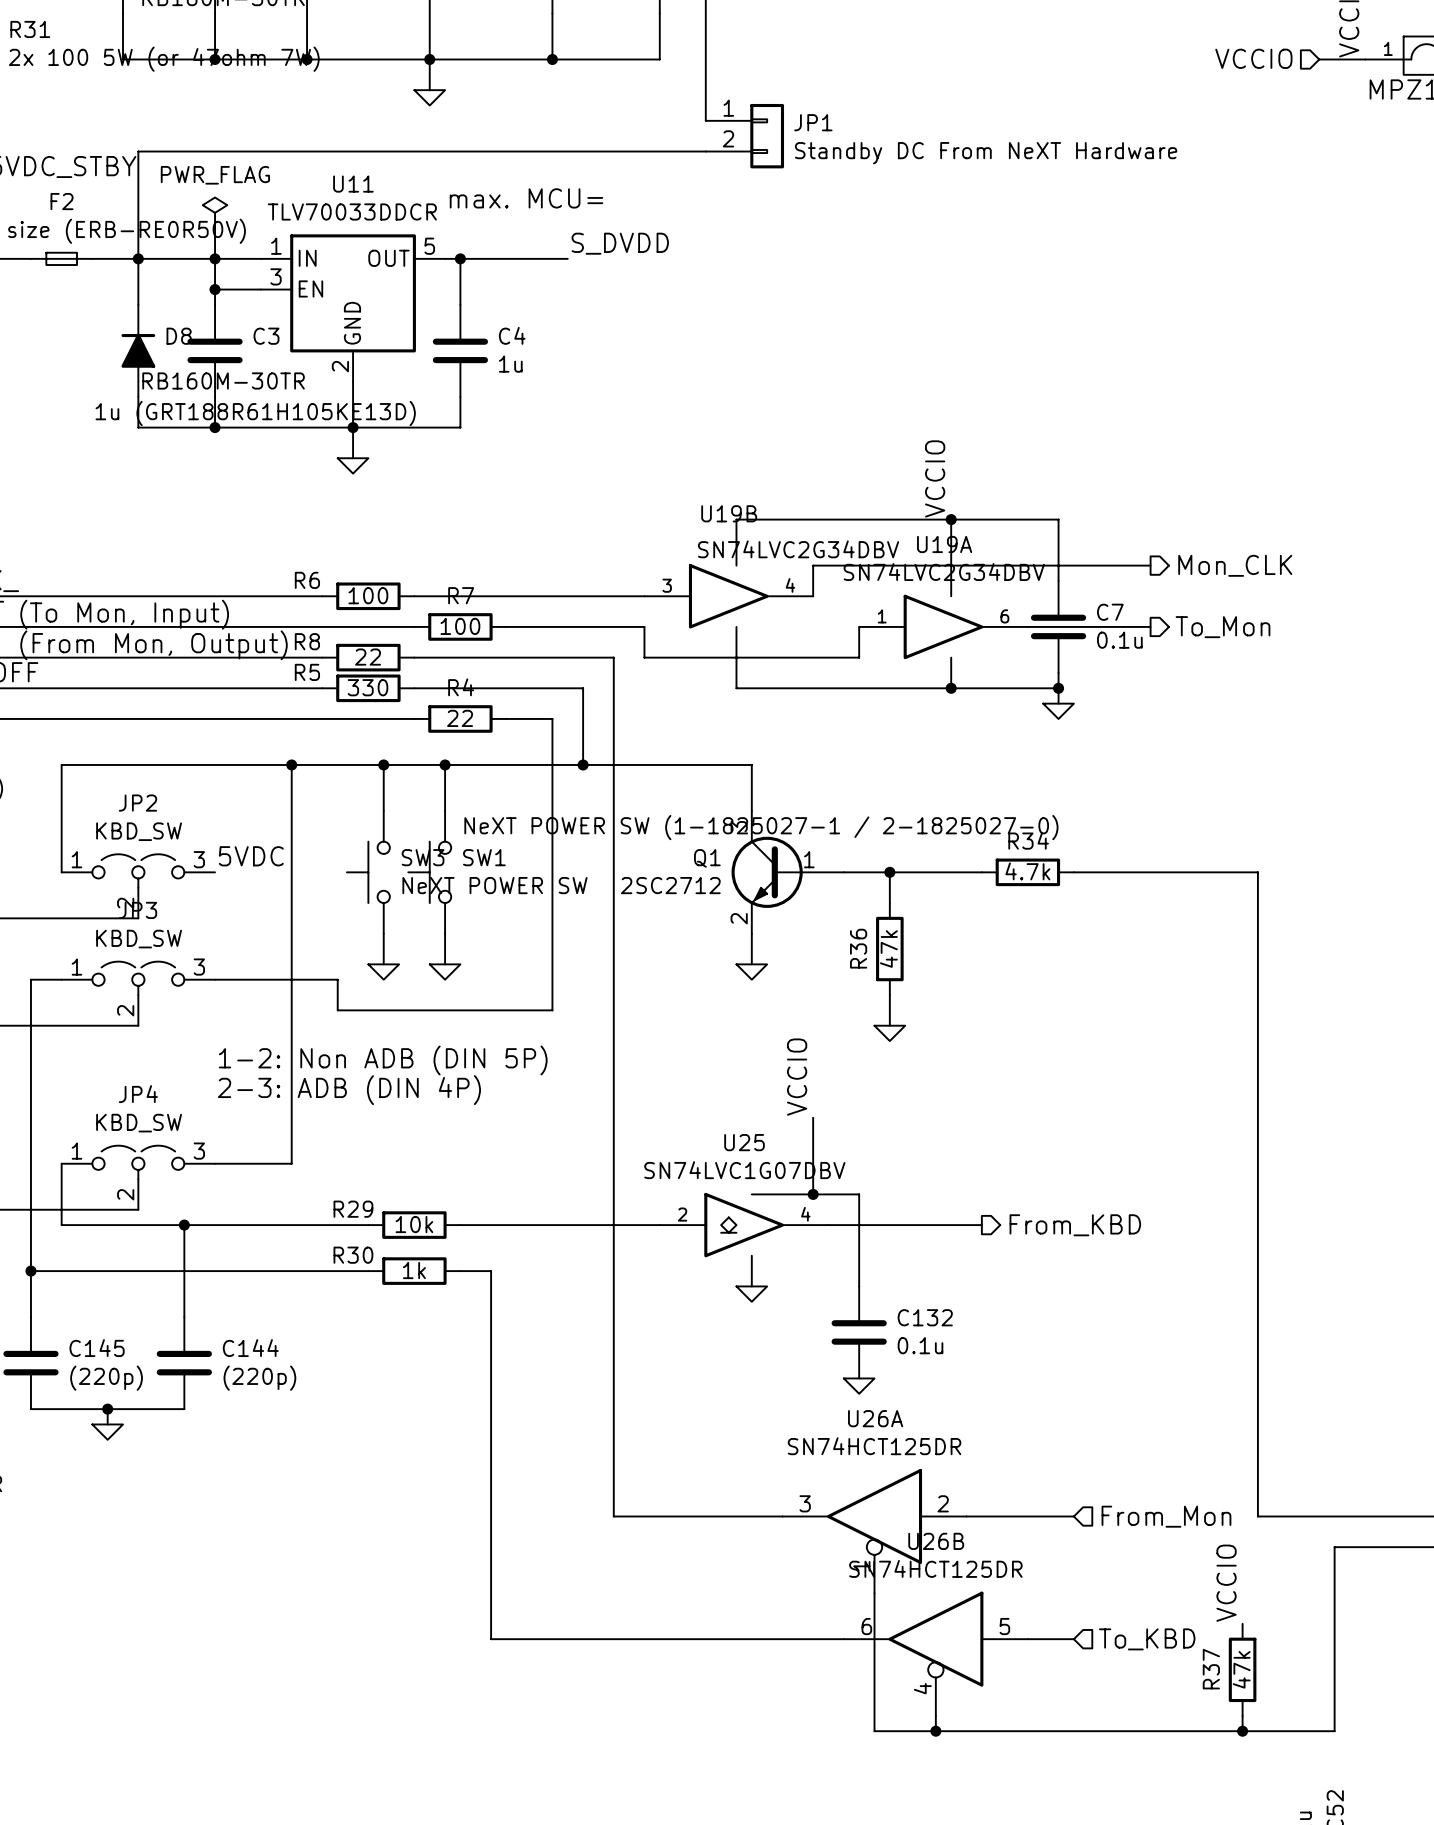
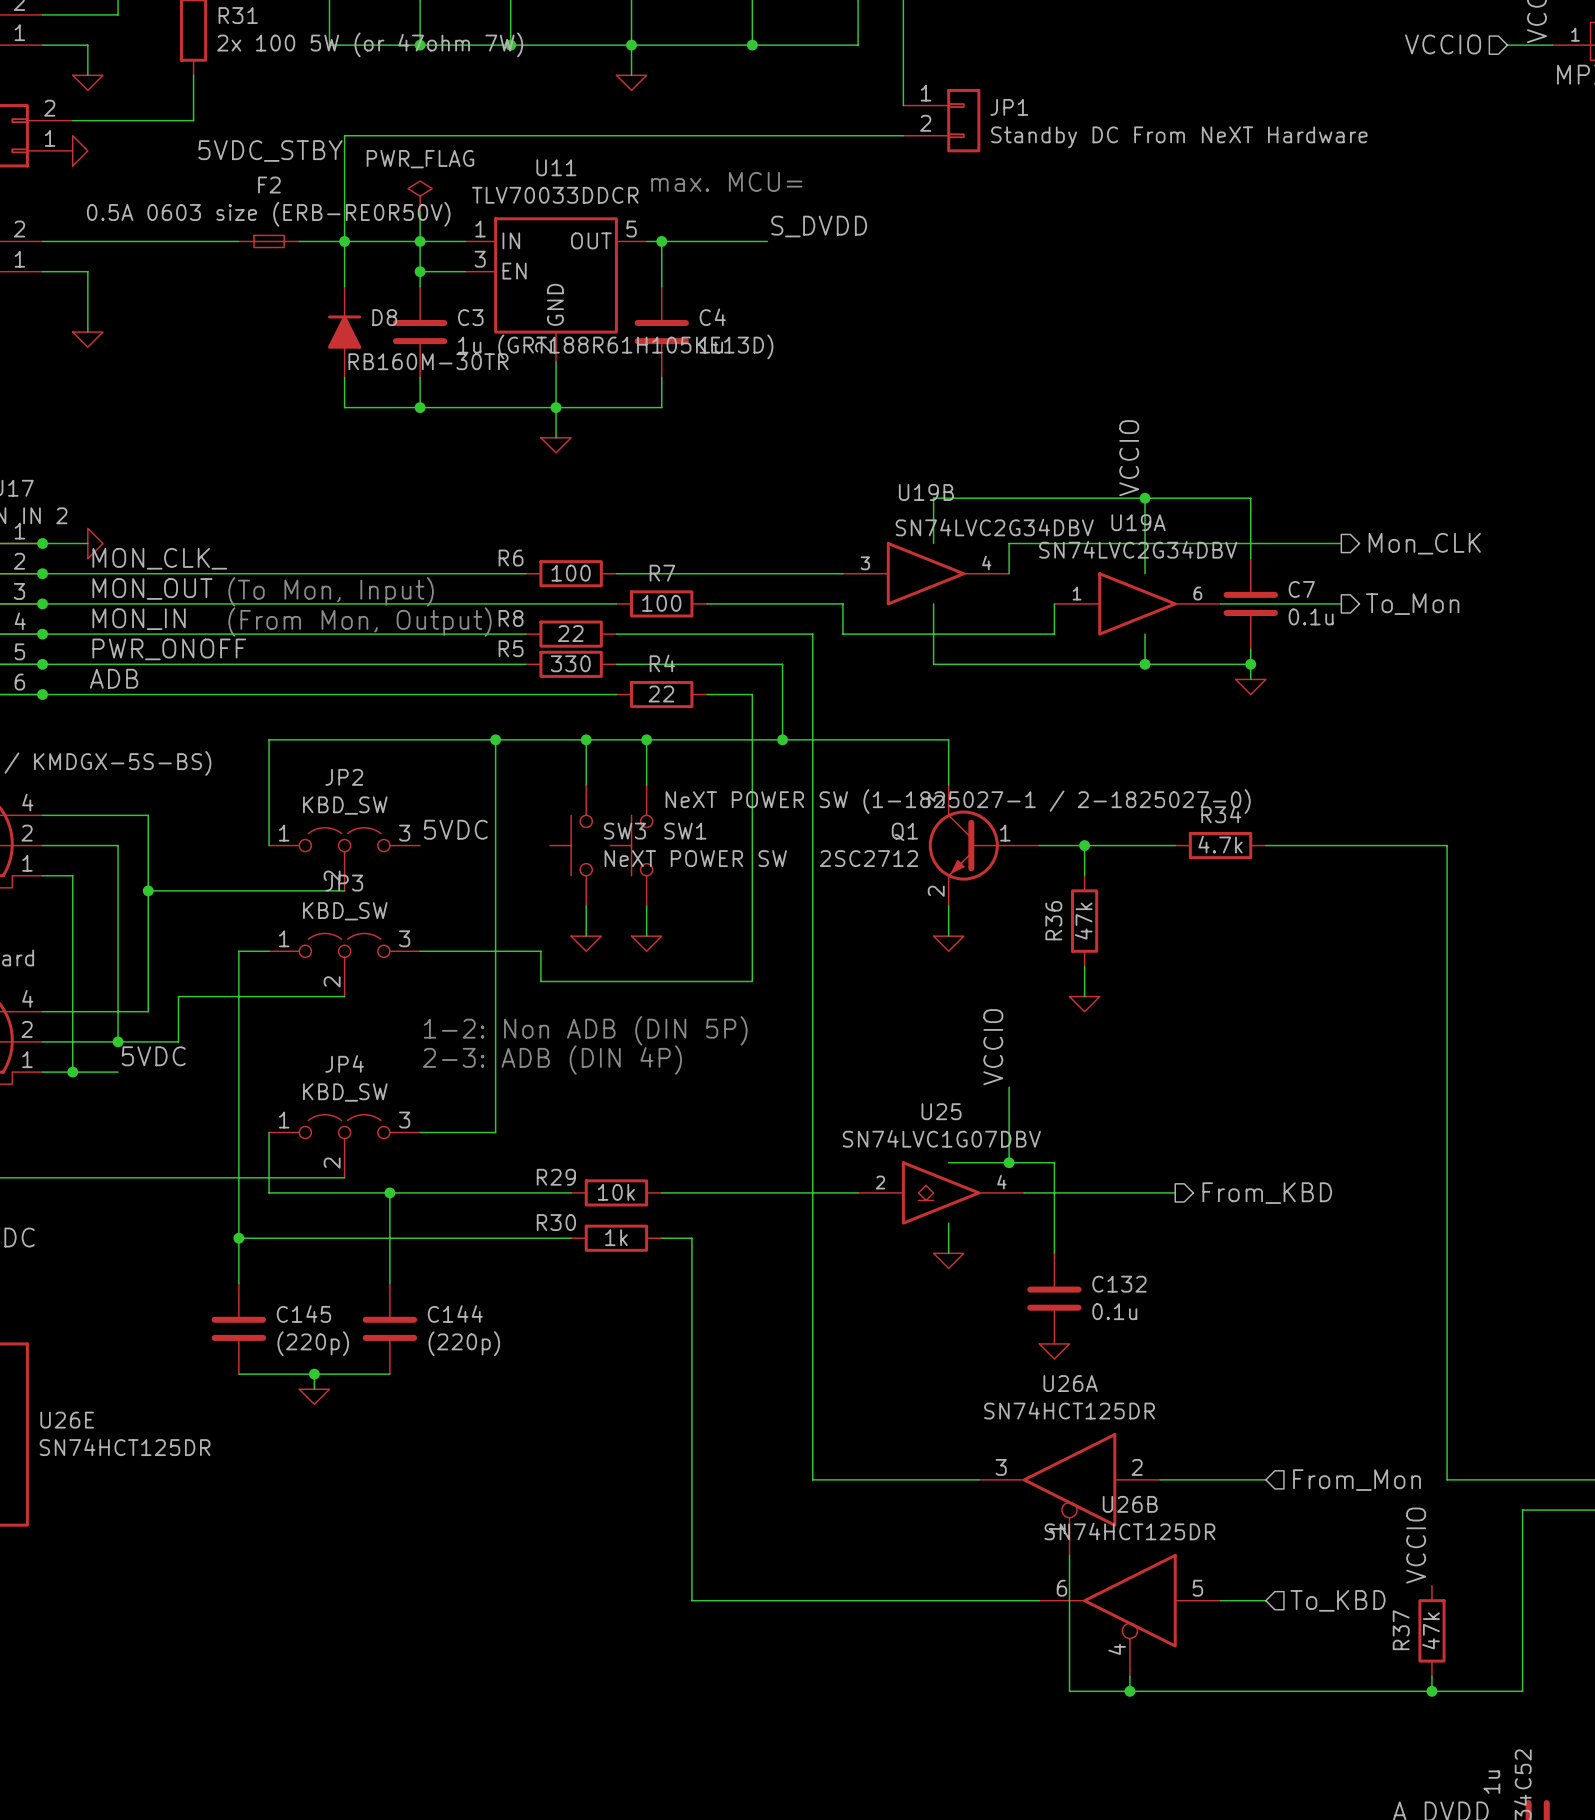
C3 value position: 1u (GRT188R61H105KE13D) (255, 413) -> 1u (GRT188R61H105KE13D) (615, 346)

